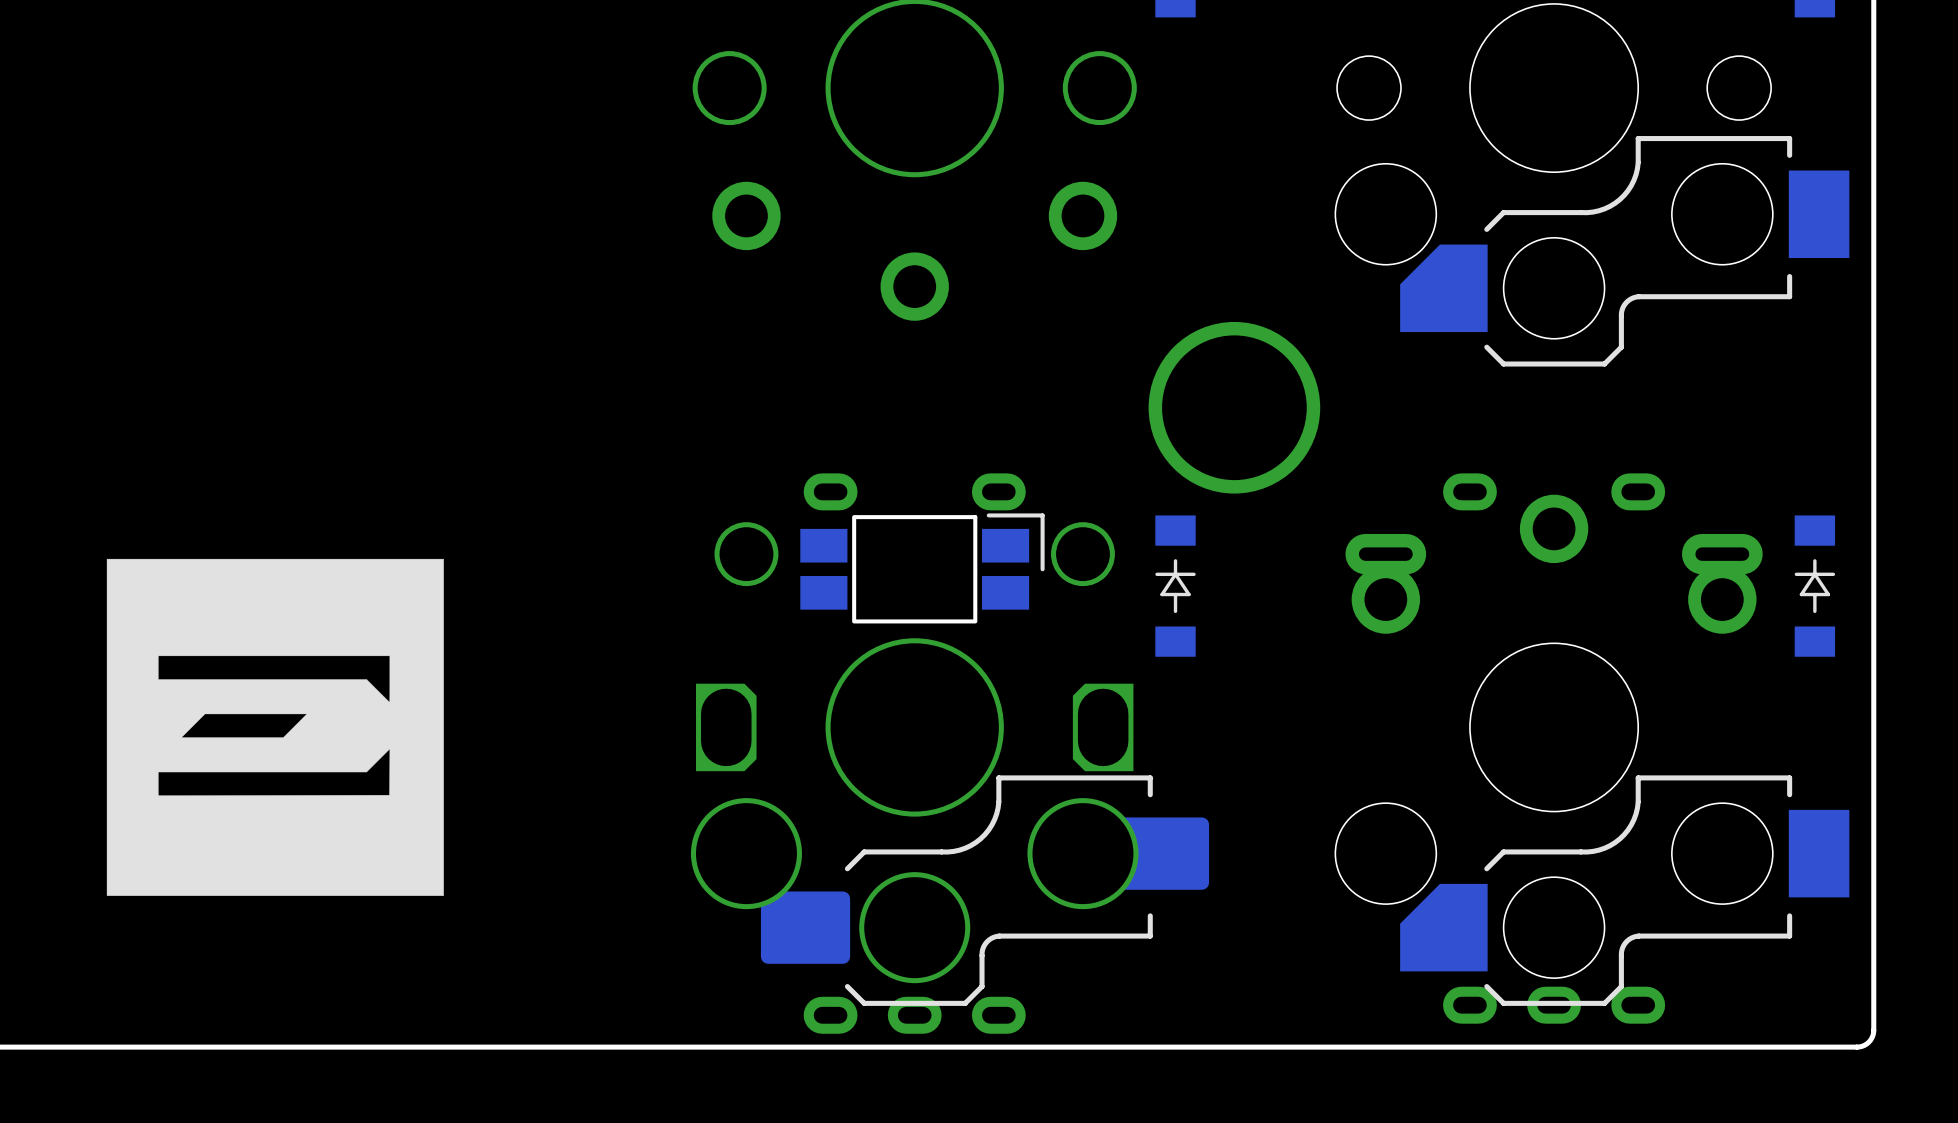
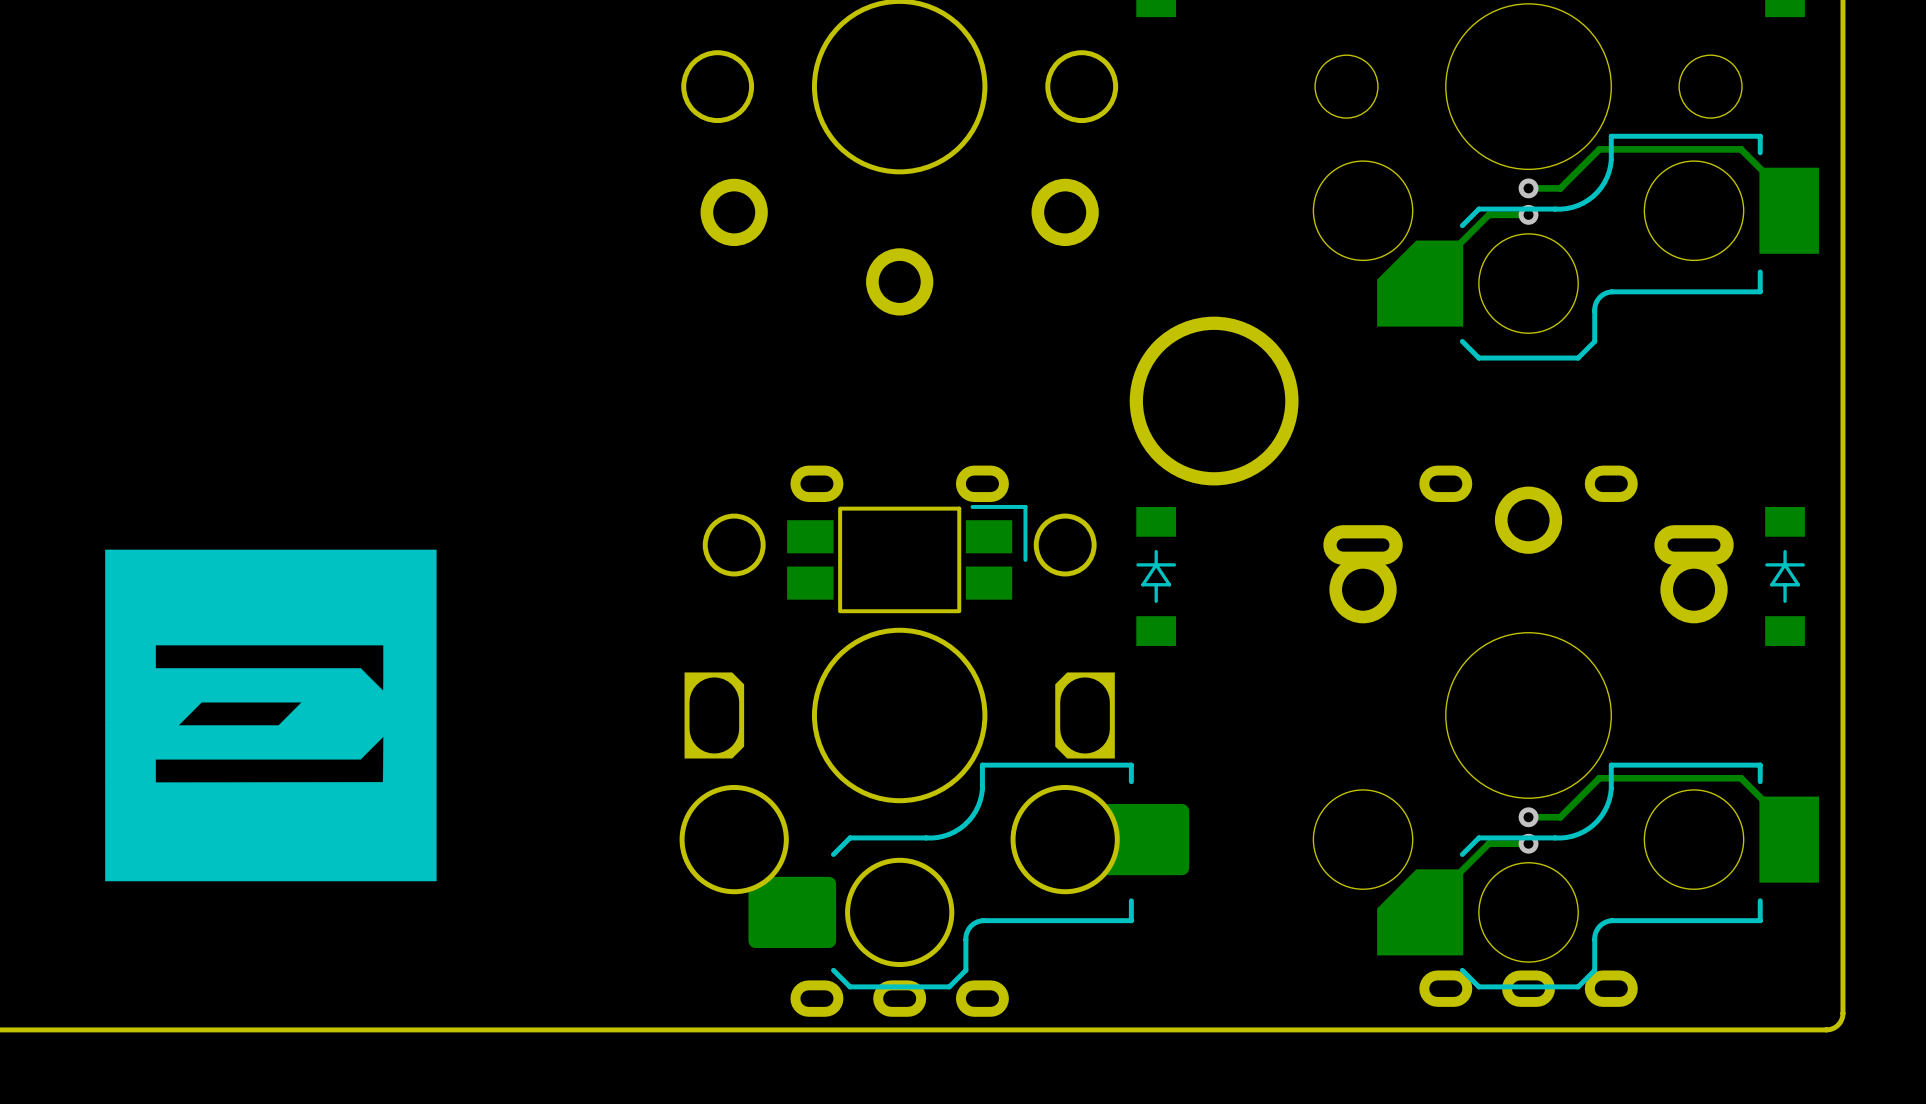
track: none -> (1528, 188) (1560, 188) (1599, 149) (1741, 149) (1802, 210)
via: none -> (1528, 188)
track: none -> (1528, 214) (1488, 214) (1420, 283)
via: none -> (1528, 214)
track: none -> (1528, 817) (1560, 817) (1599, 778) (1741, 778) (1802, 839)
via: none -> (1528, 817)
track: none -> (1528, 843) (1488, 843) (1420, 912)
via: none -> (1528, 843)

